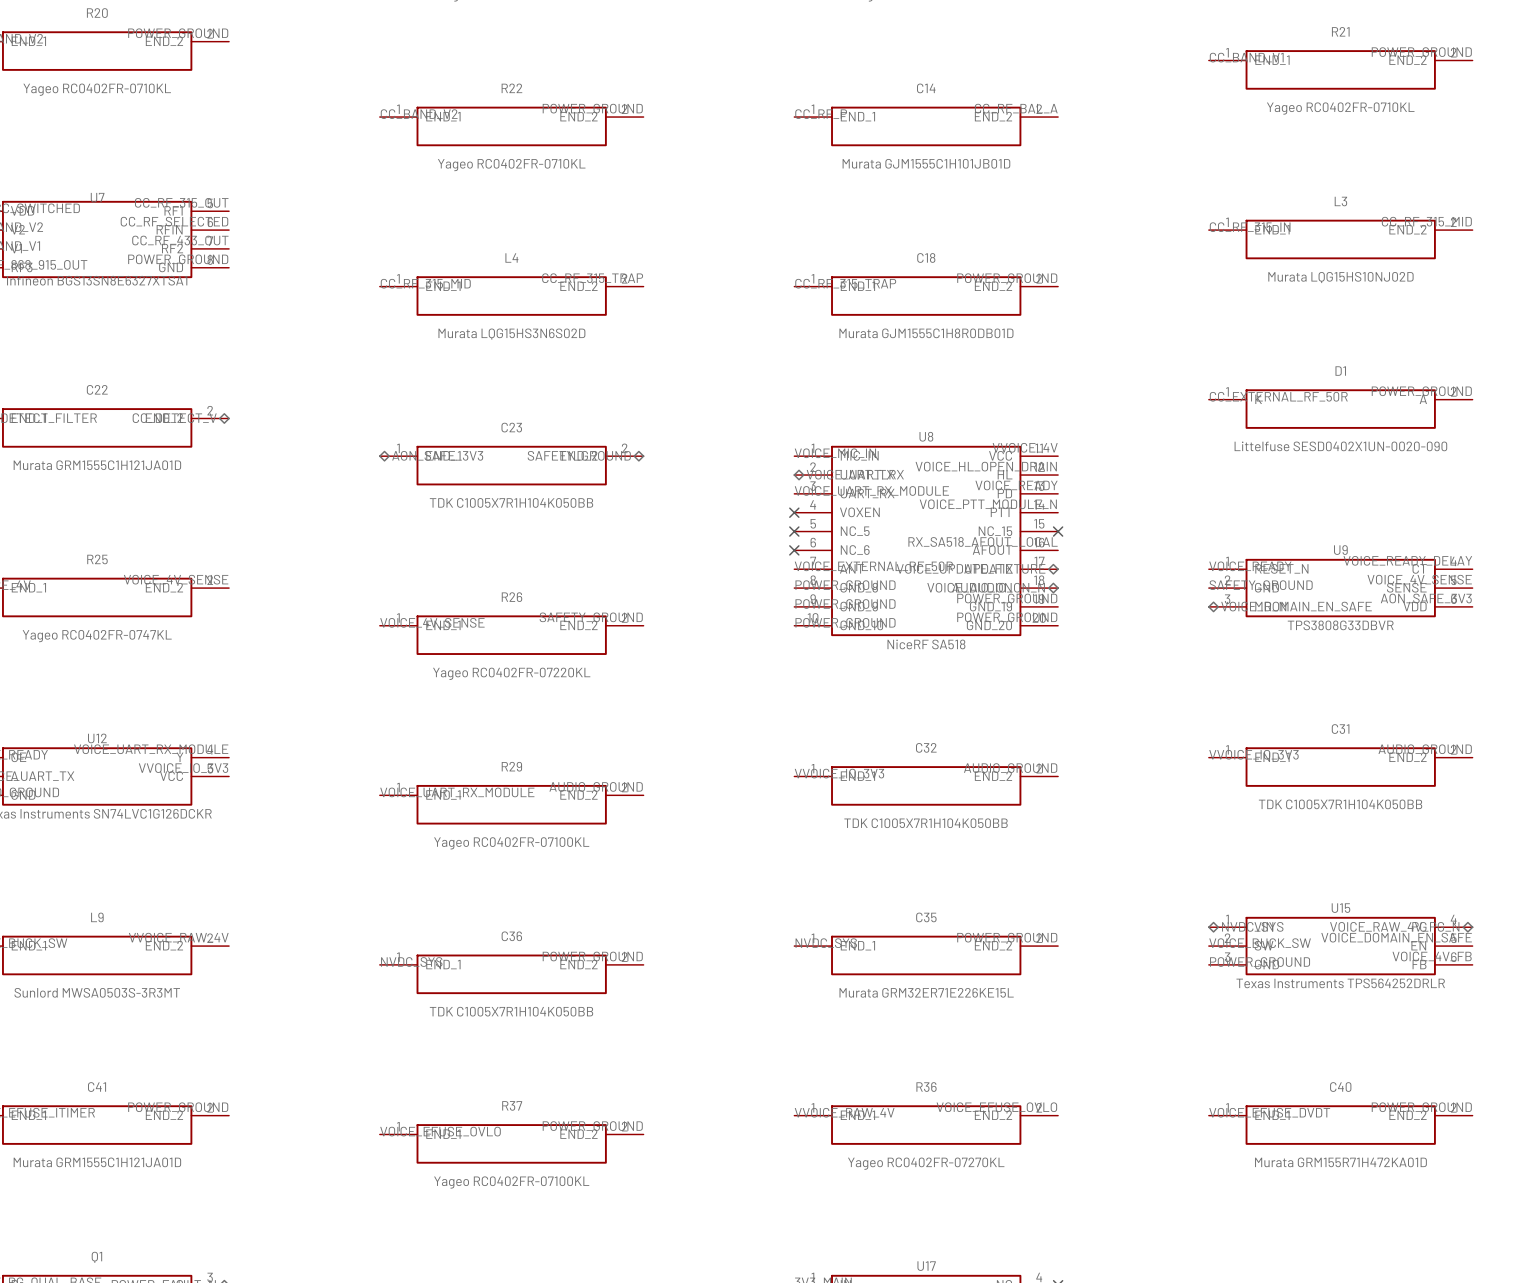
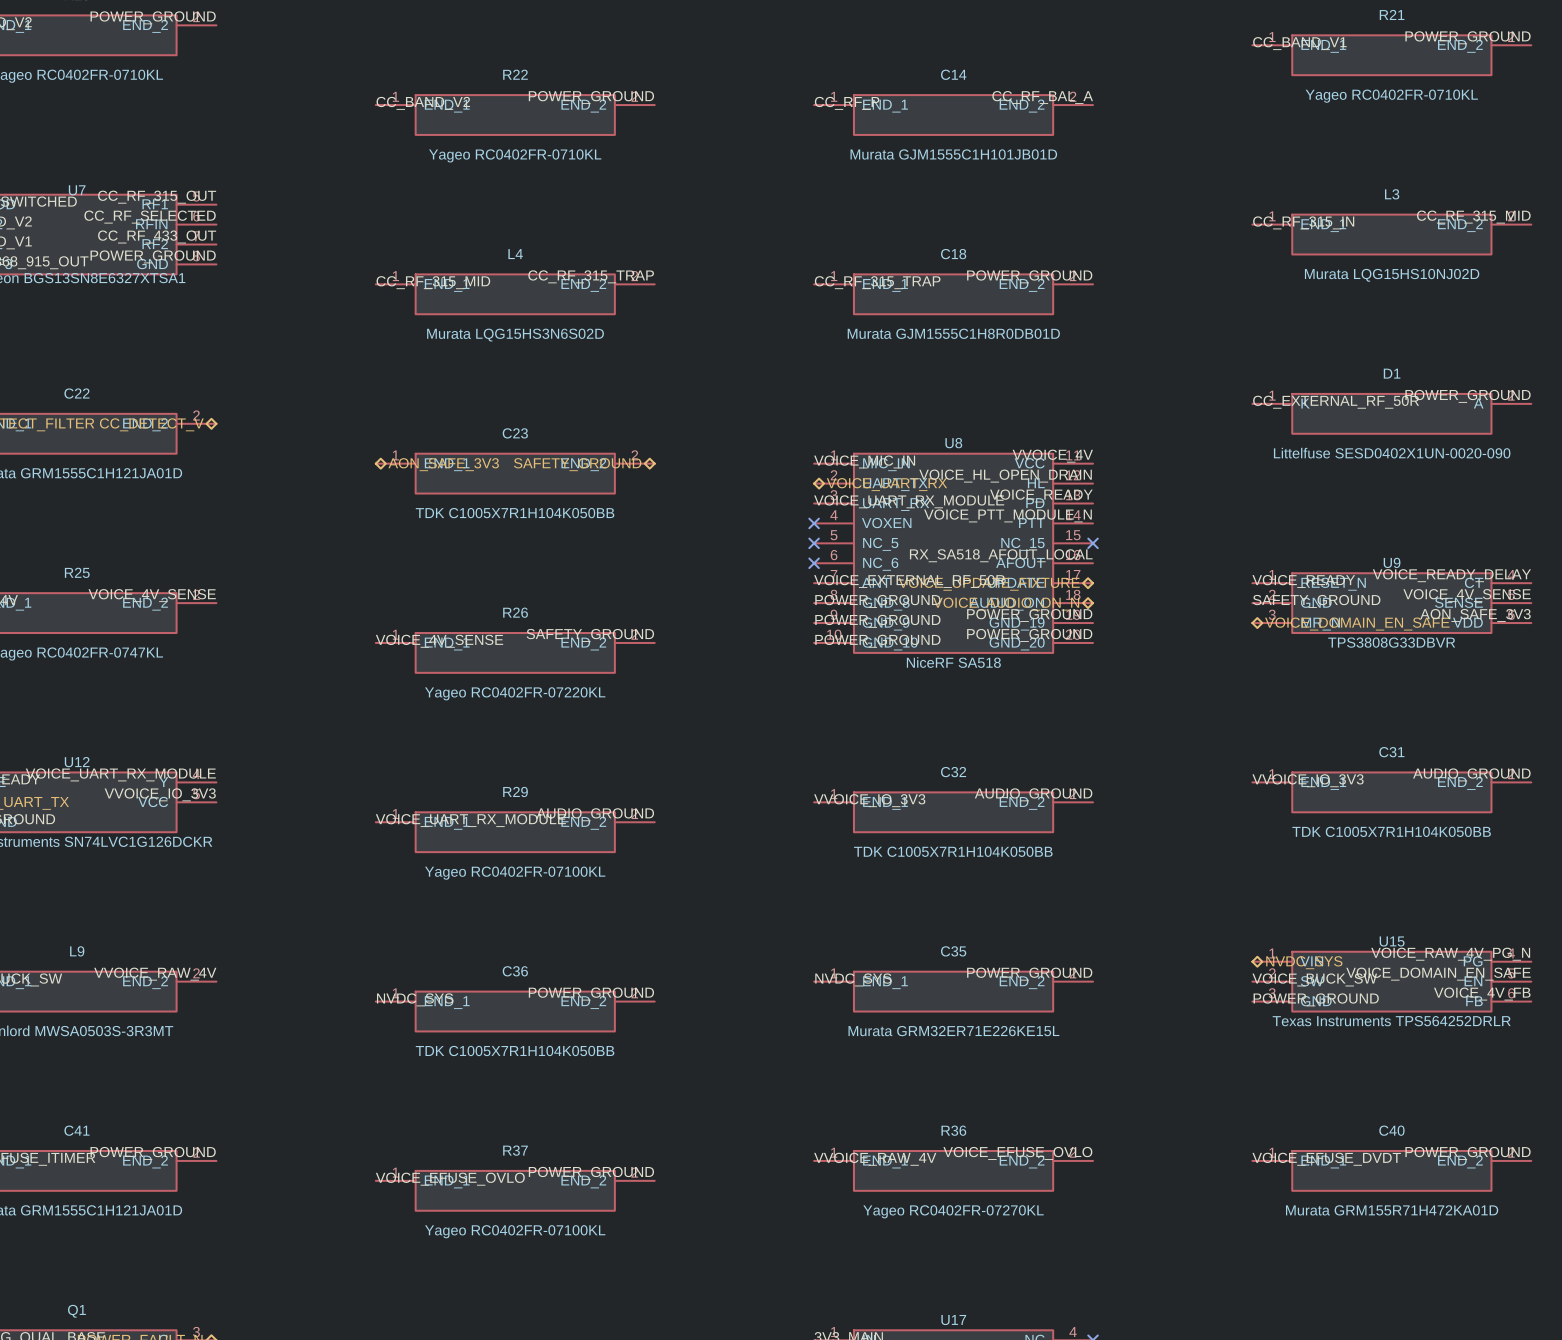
label: none -> VOICE_RAW_4V_PG_N (1450, 954)
hierarchical label: VOICE_RAW_4V_PG_N (1394, 926) -> none

